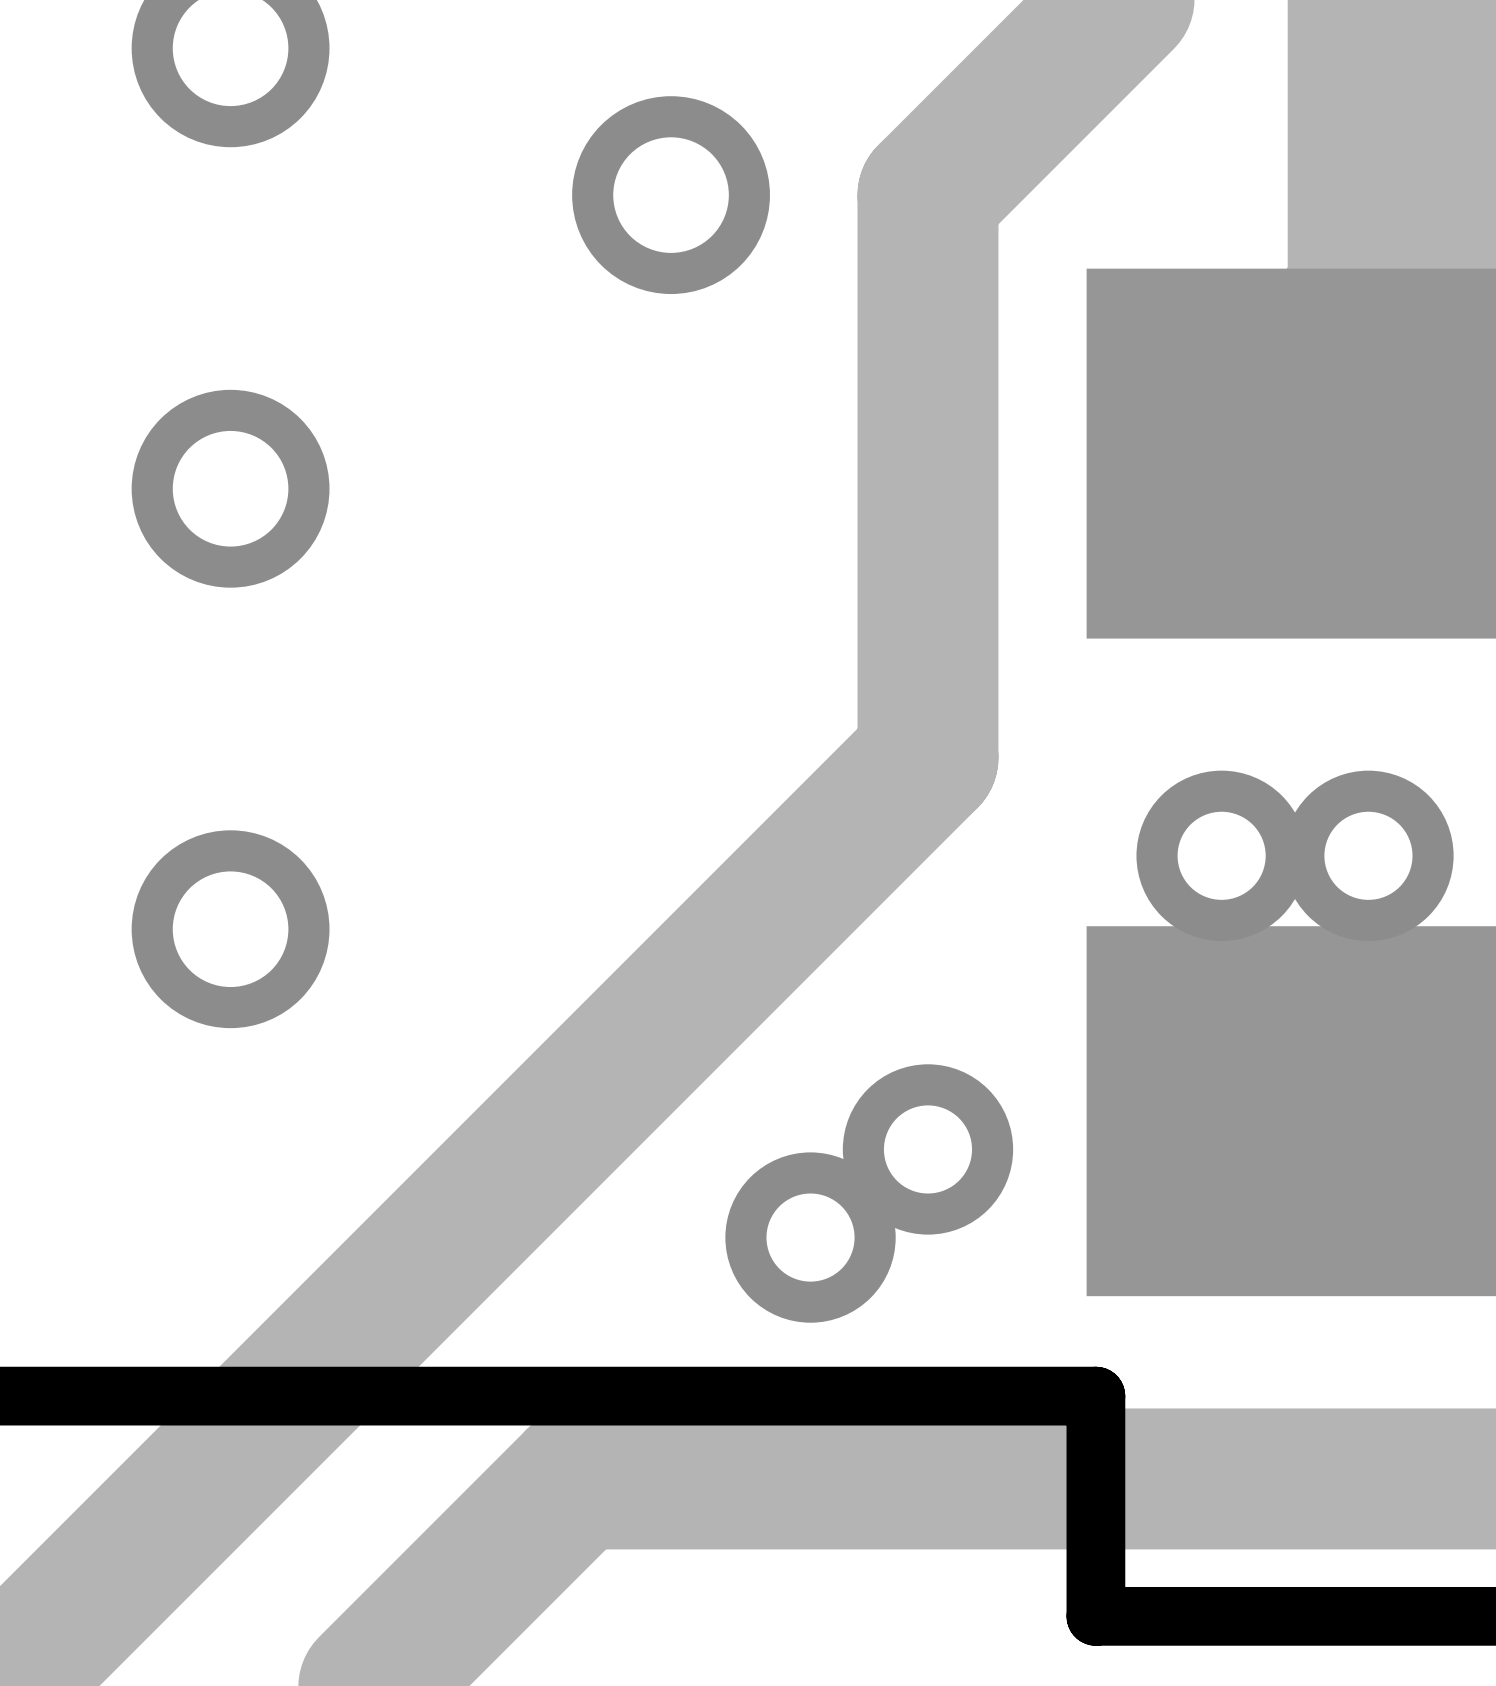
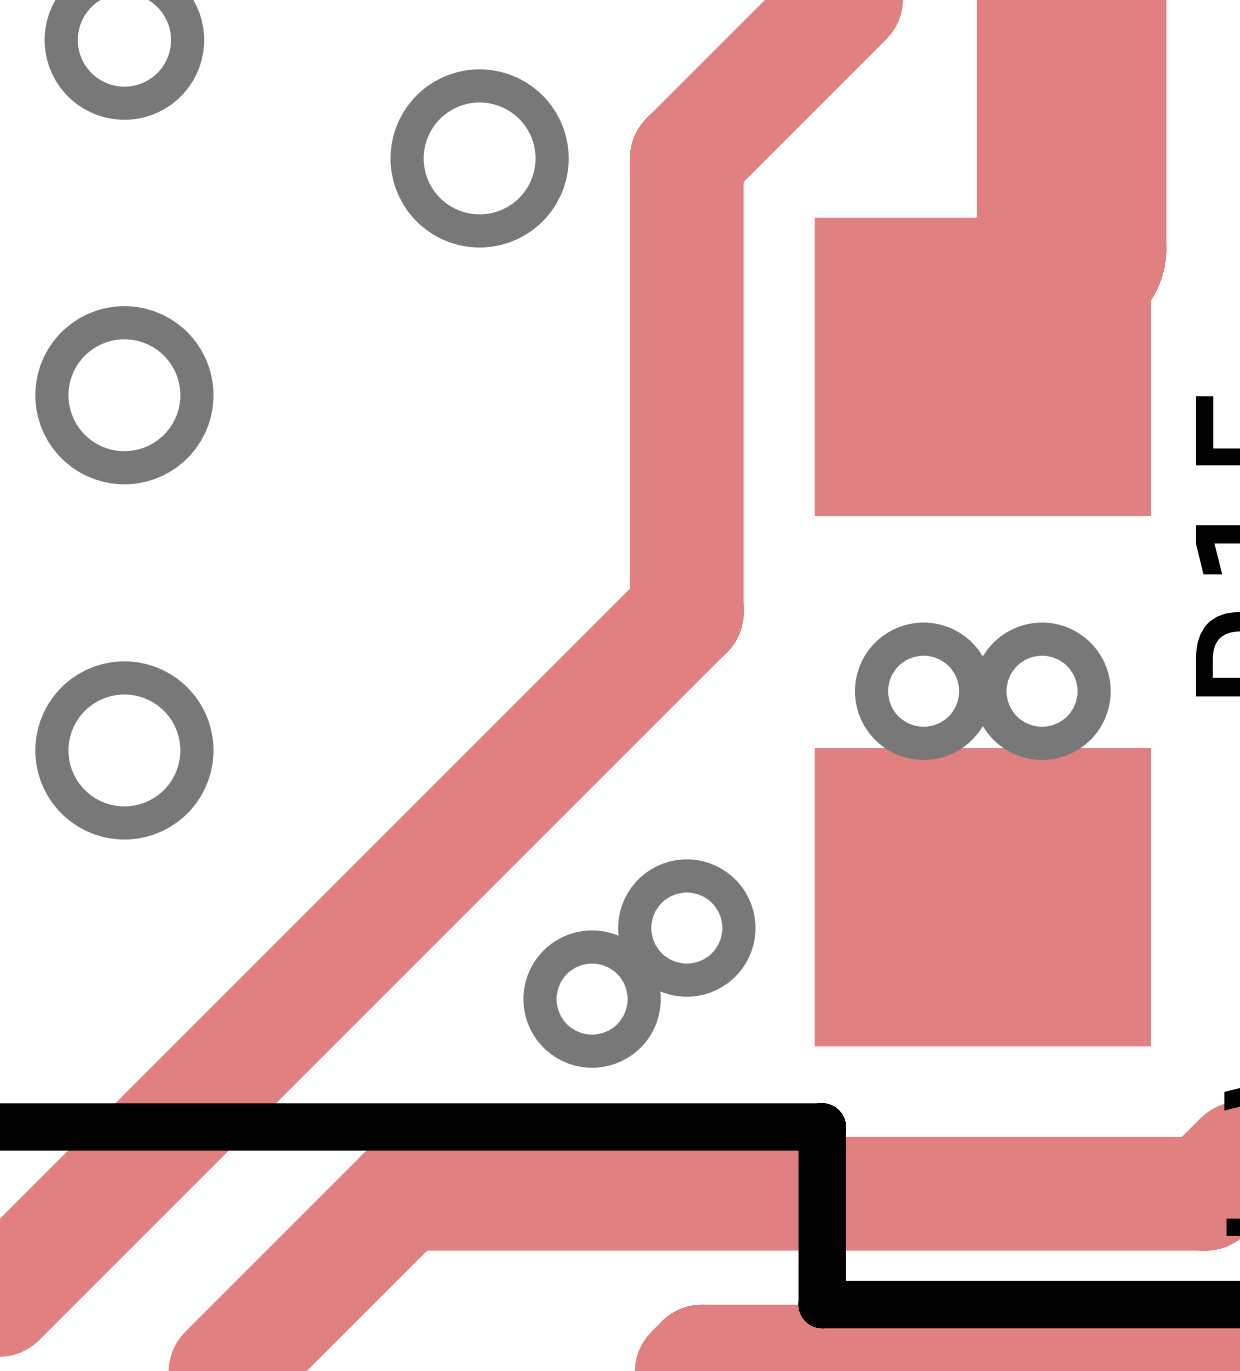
via size: [572, 96, 770, 295] -> [390, 69, 569, 248]
via size: [131, 389, 330, 588] -> [35, 306, 214, 485]
via size: [131, 830, 330, 1029] -> [35, 661, 214, 840]

